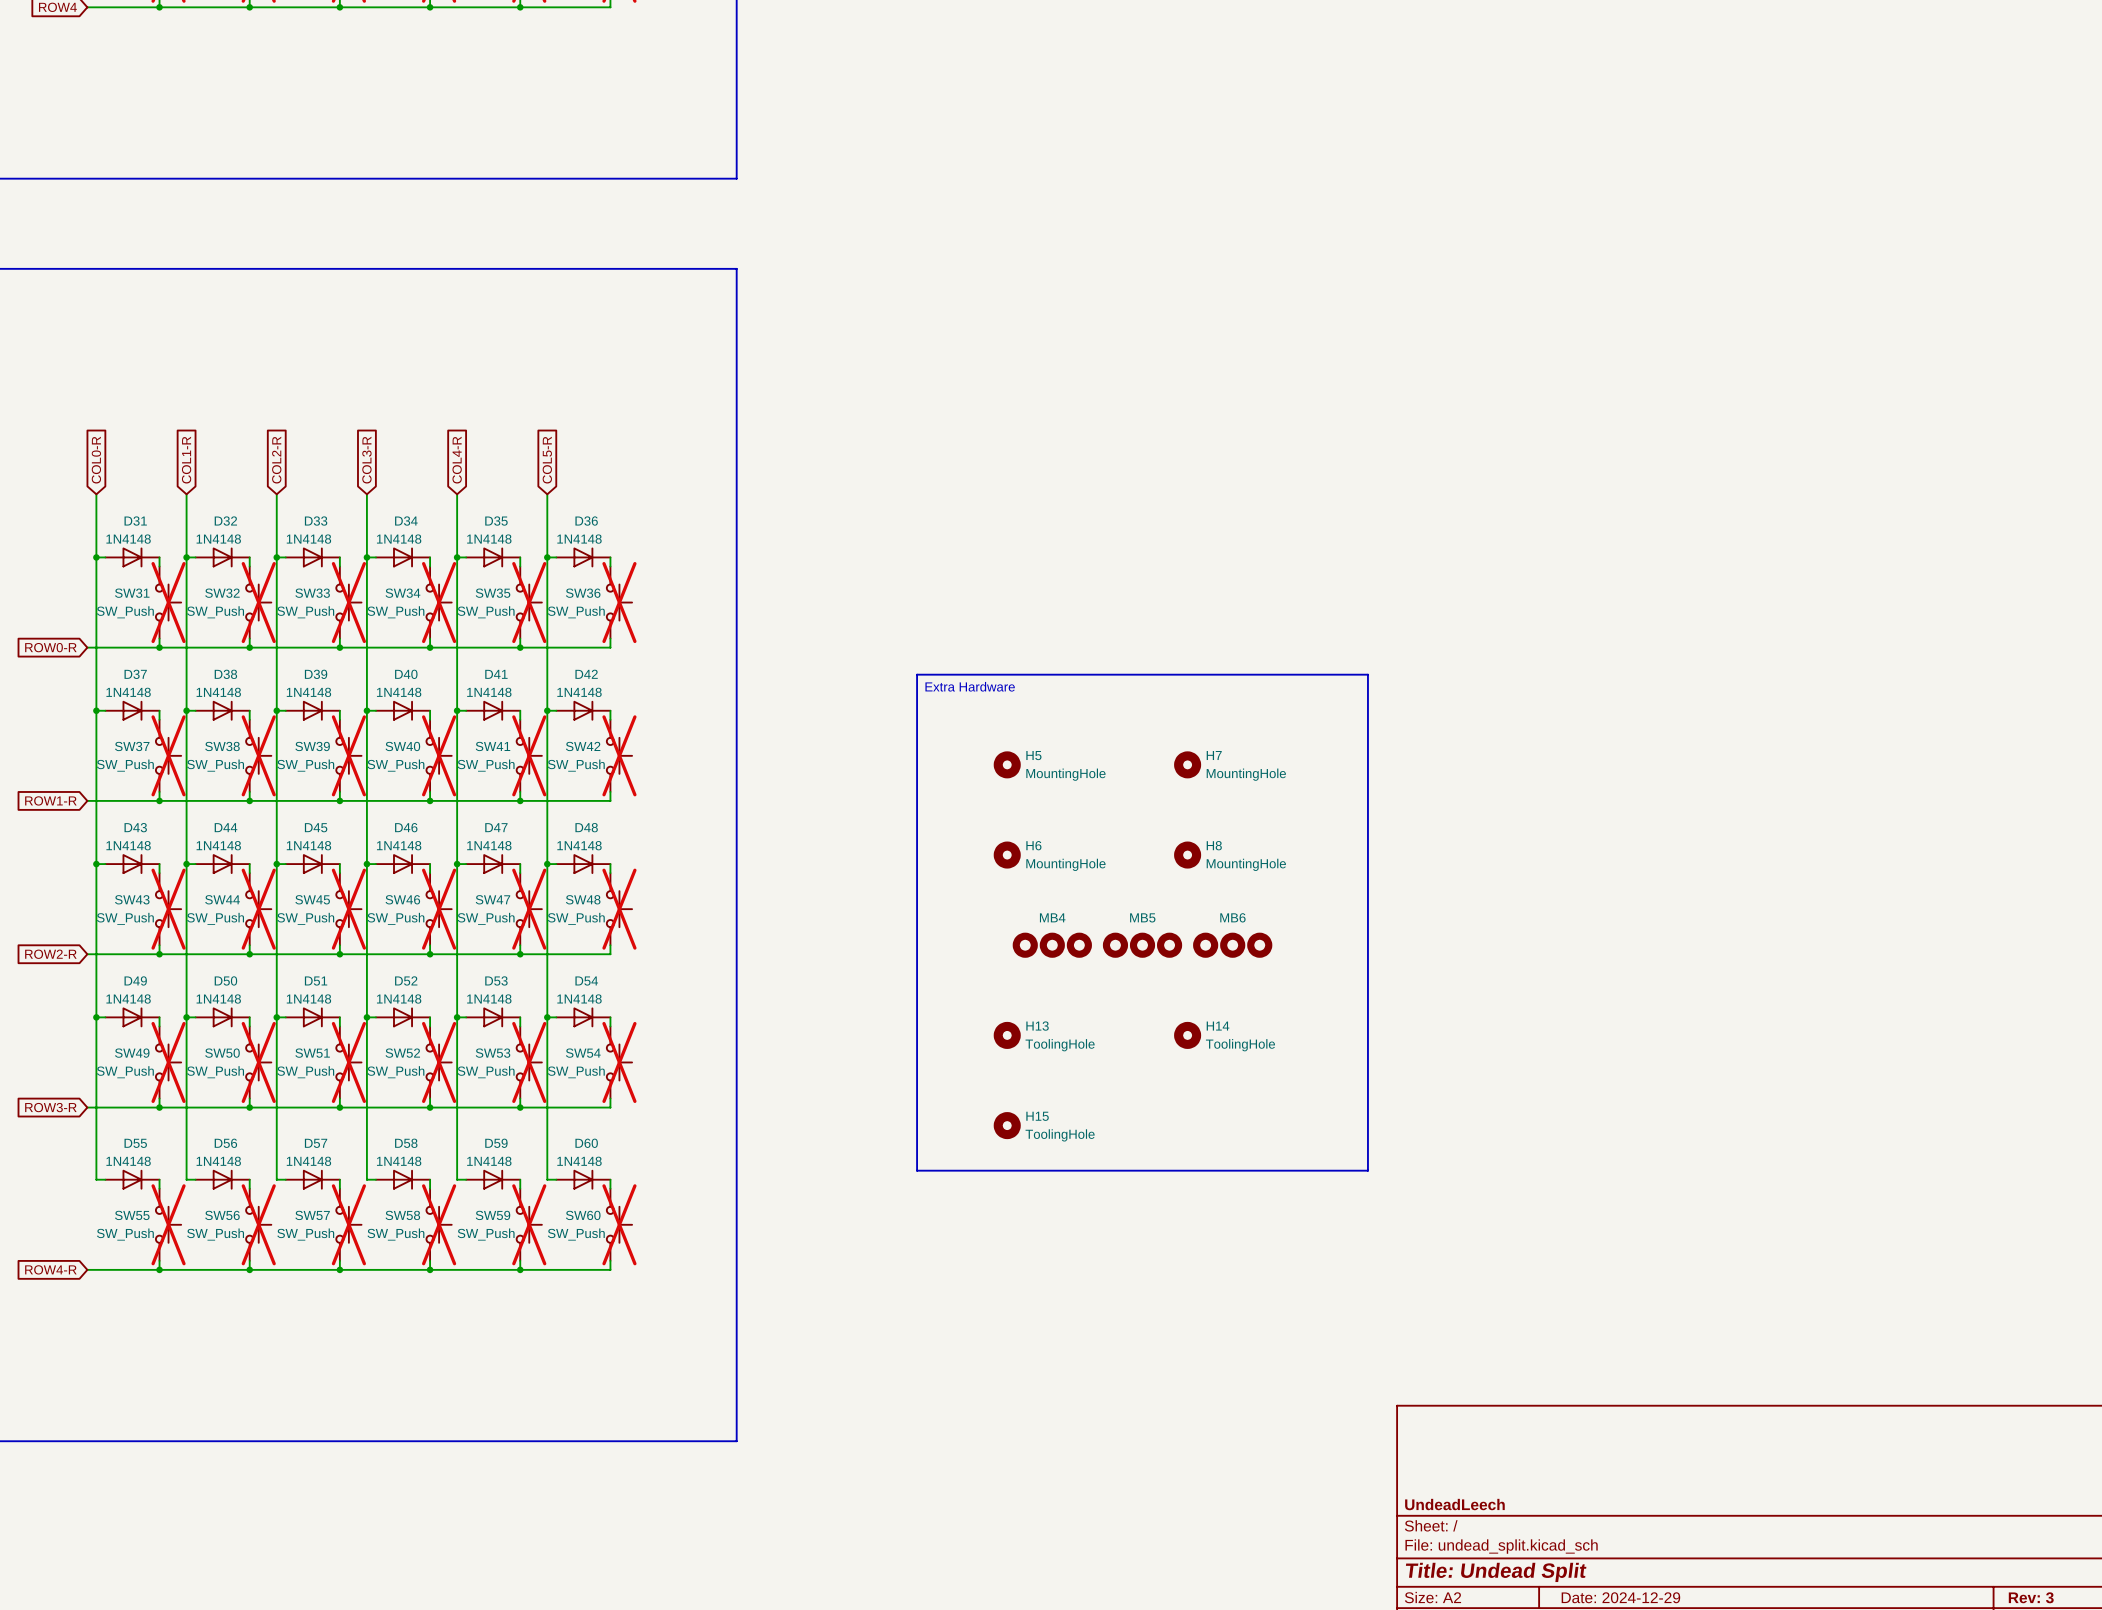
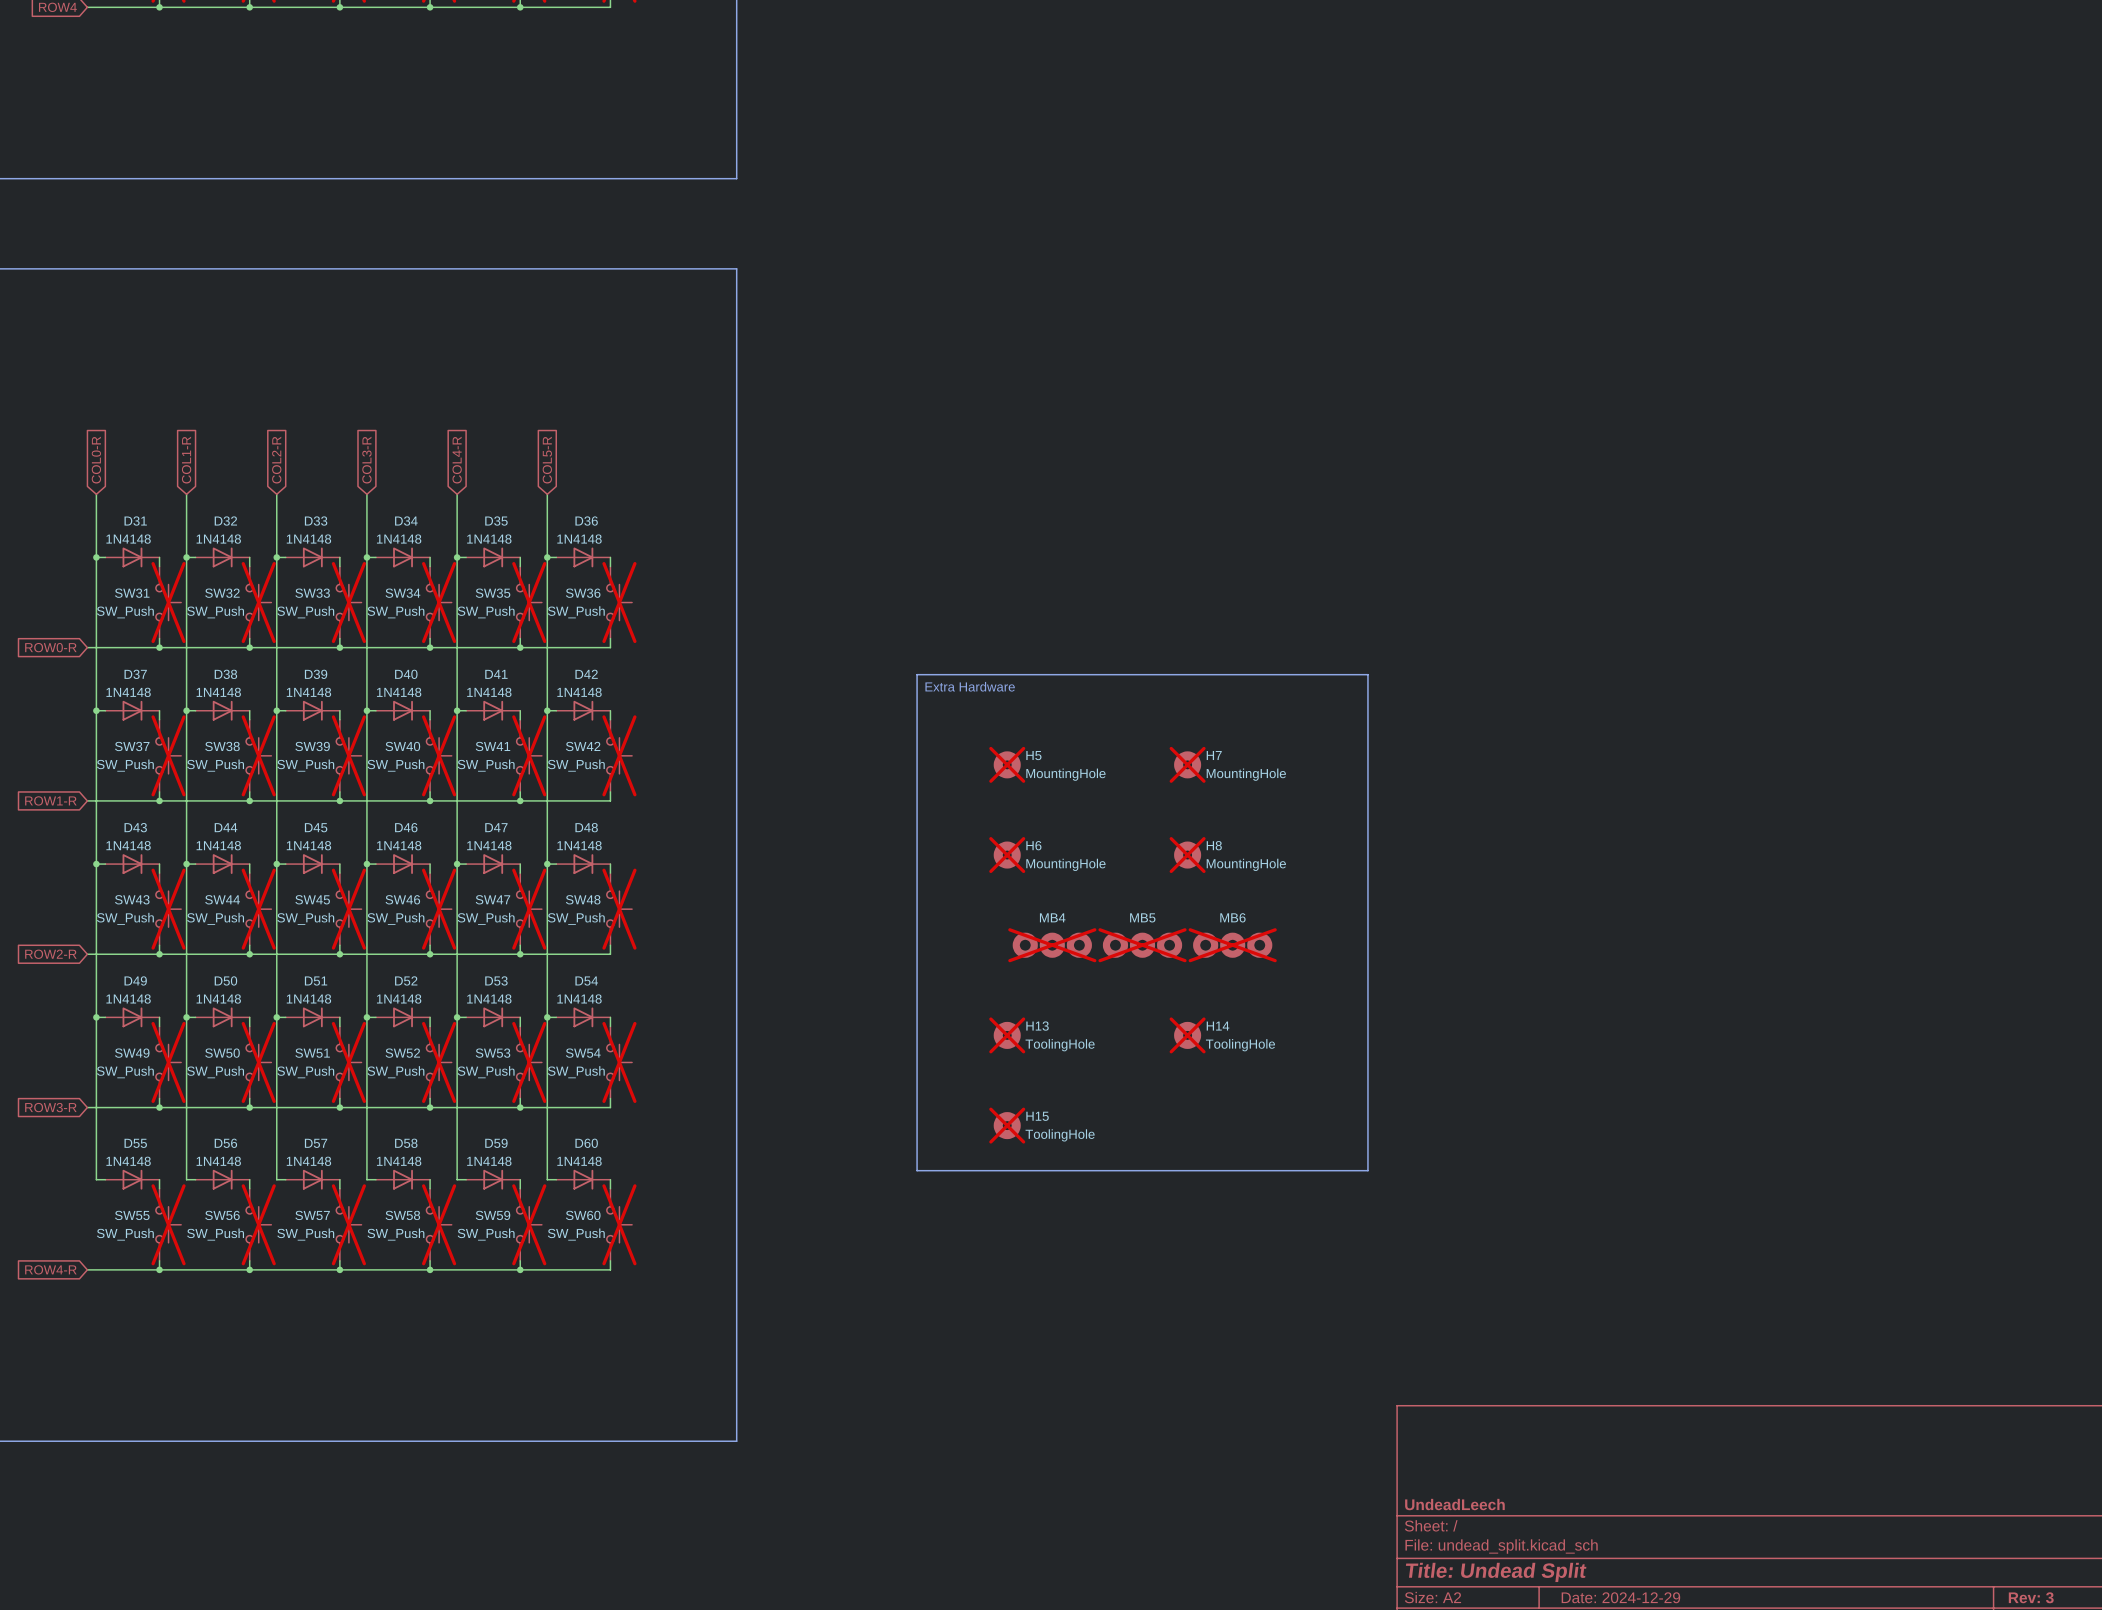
H5 do-not-place cross: none -> (1007, 764)
H7 do-not-place cross: none -> (1187, 764)
H6 do-not-place cross: none -> (1007, 855)
H8 do-not-place cross: none -> (1187, 855)
MB4 do-not-place cross: none -> (1052, 945)
MB5 do-not-place cross: none -> (1142, 945)
MB6 do-not-place cross: none -> (1232, 945)
H13 do-not-place cross: none -> (1007, 1035)
H14 do-not-place cross: none -> (1187, 1035)
H15 do-not-place cross: none -> (1007, 1125)

